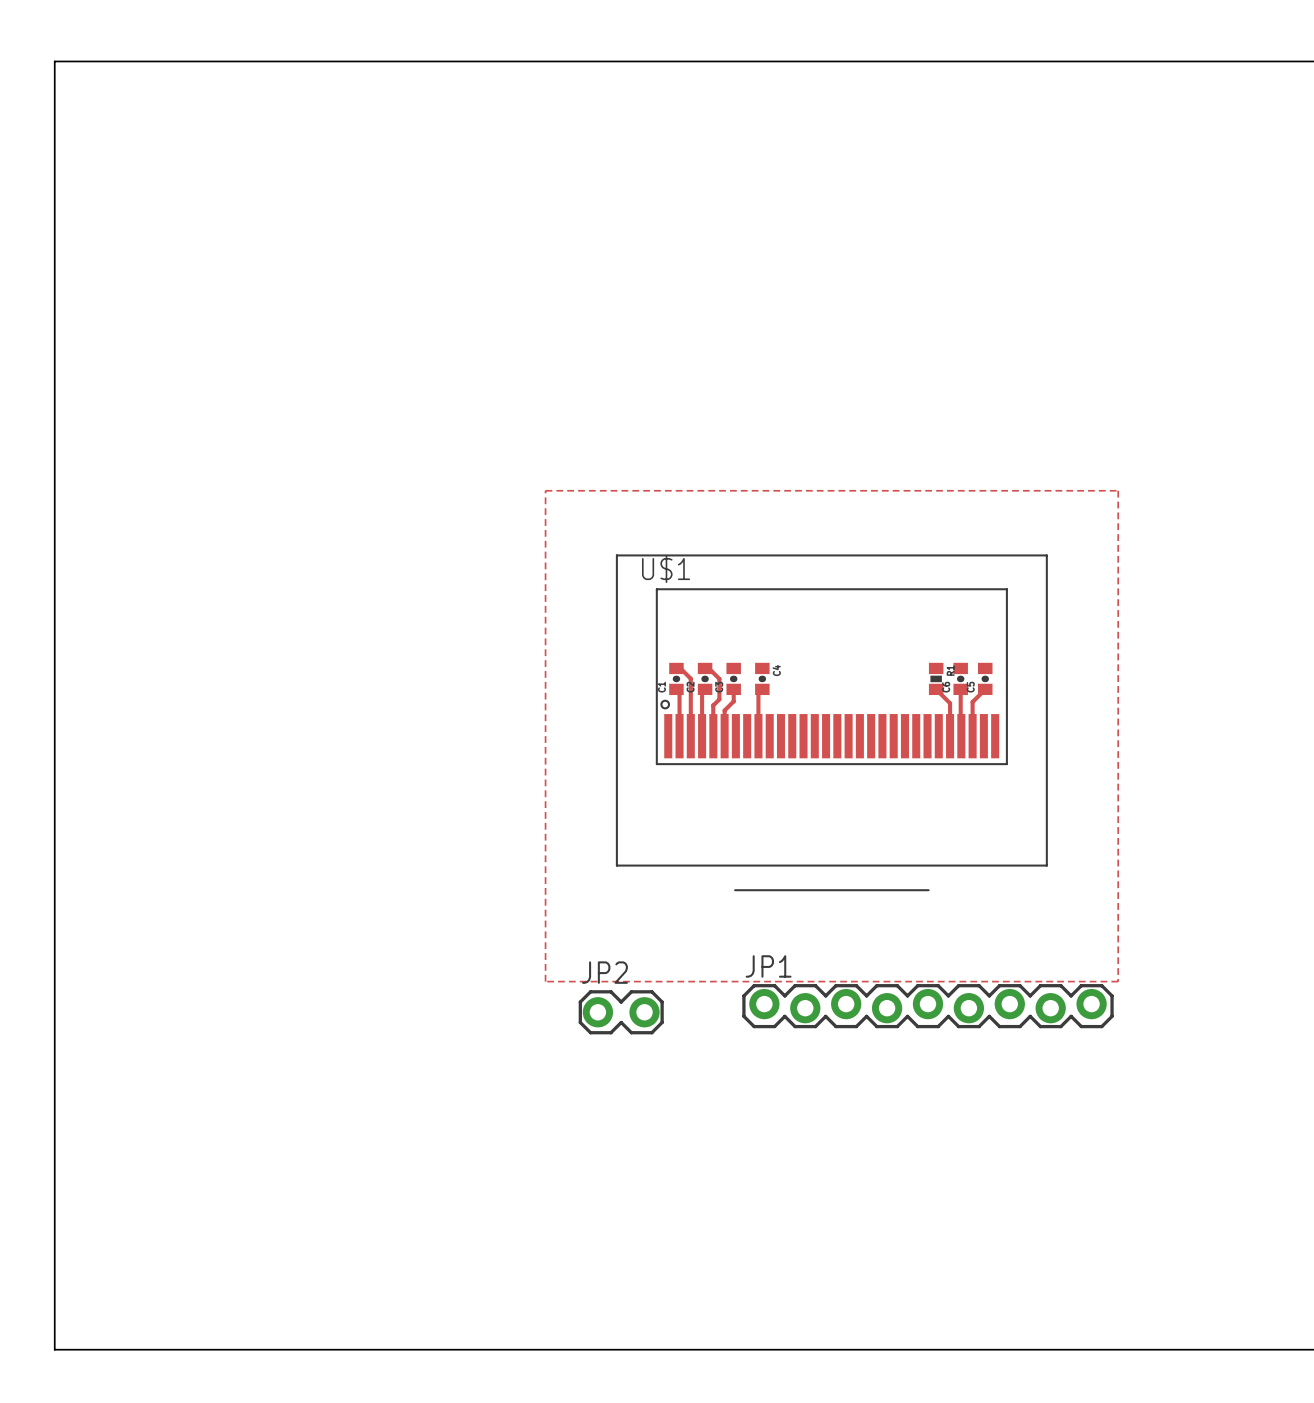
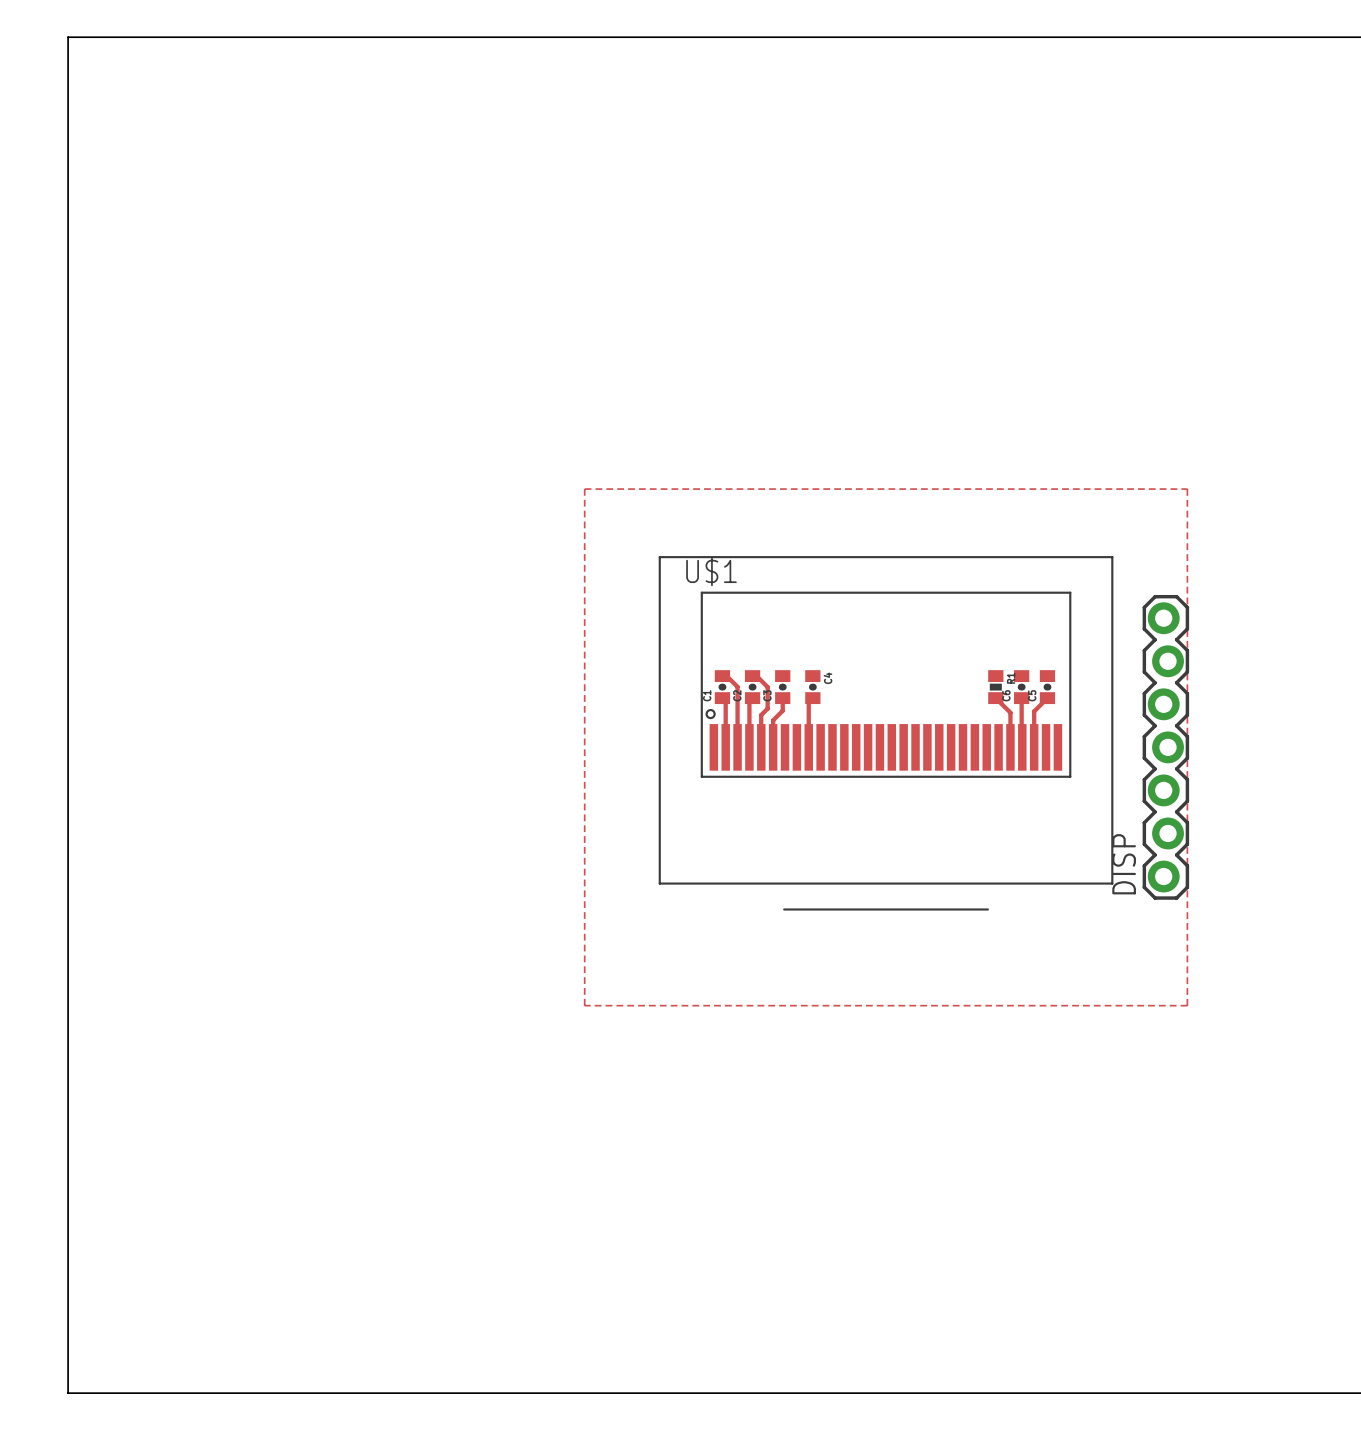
DISP: none -> (1165, 747)
JP1: (927, 1006) -> none
JP2: (621, 1012) -> none

